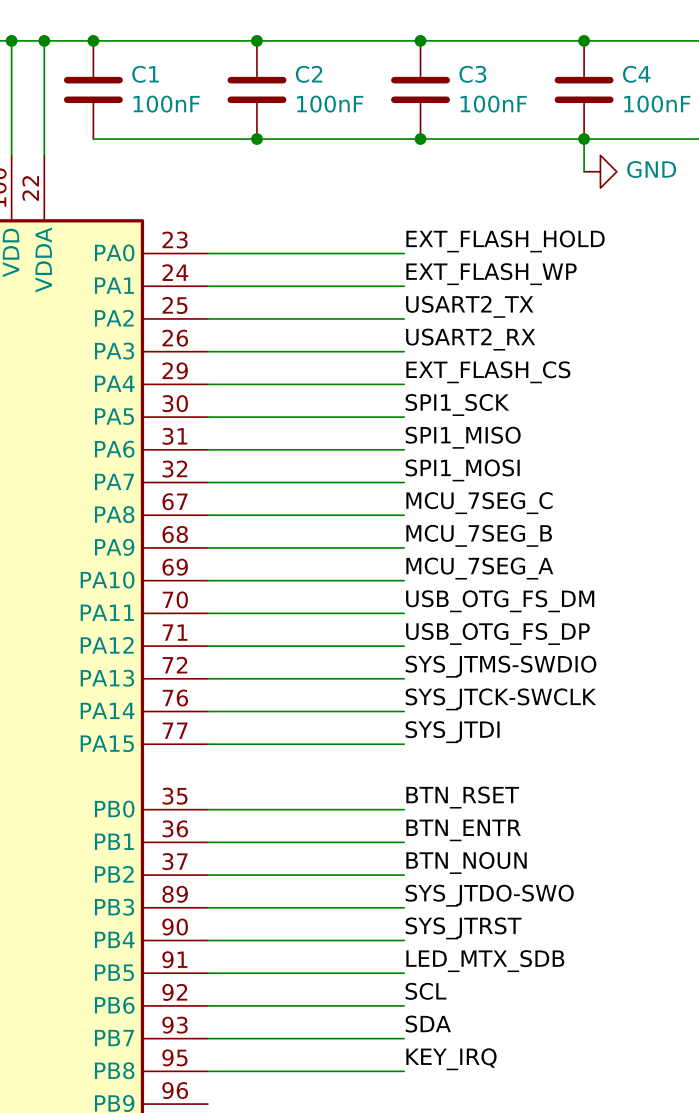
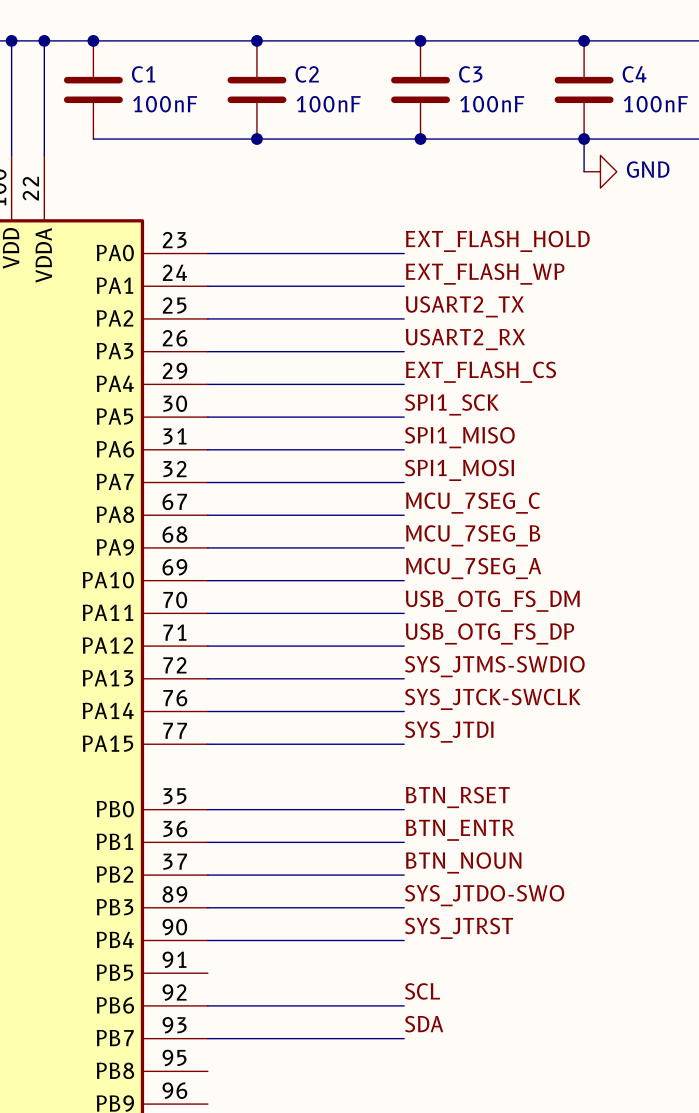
label: LED_MTX_SDB (485, 961) -> none
wire: (207, 973) (404, 973) -> none
label: KEY_IRQ (451, 1059) -> none
wire: (207, 1071) (404, 1071) -> none

